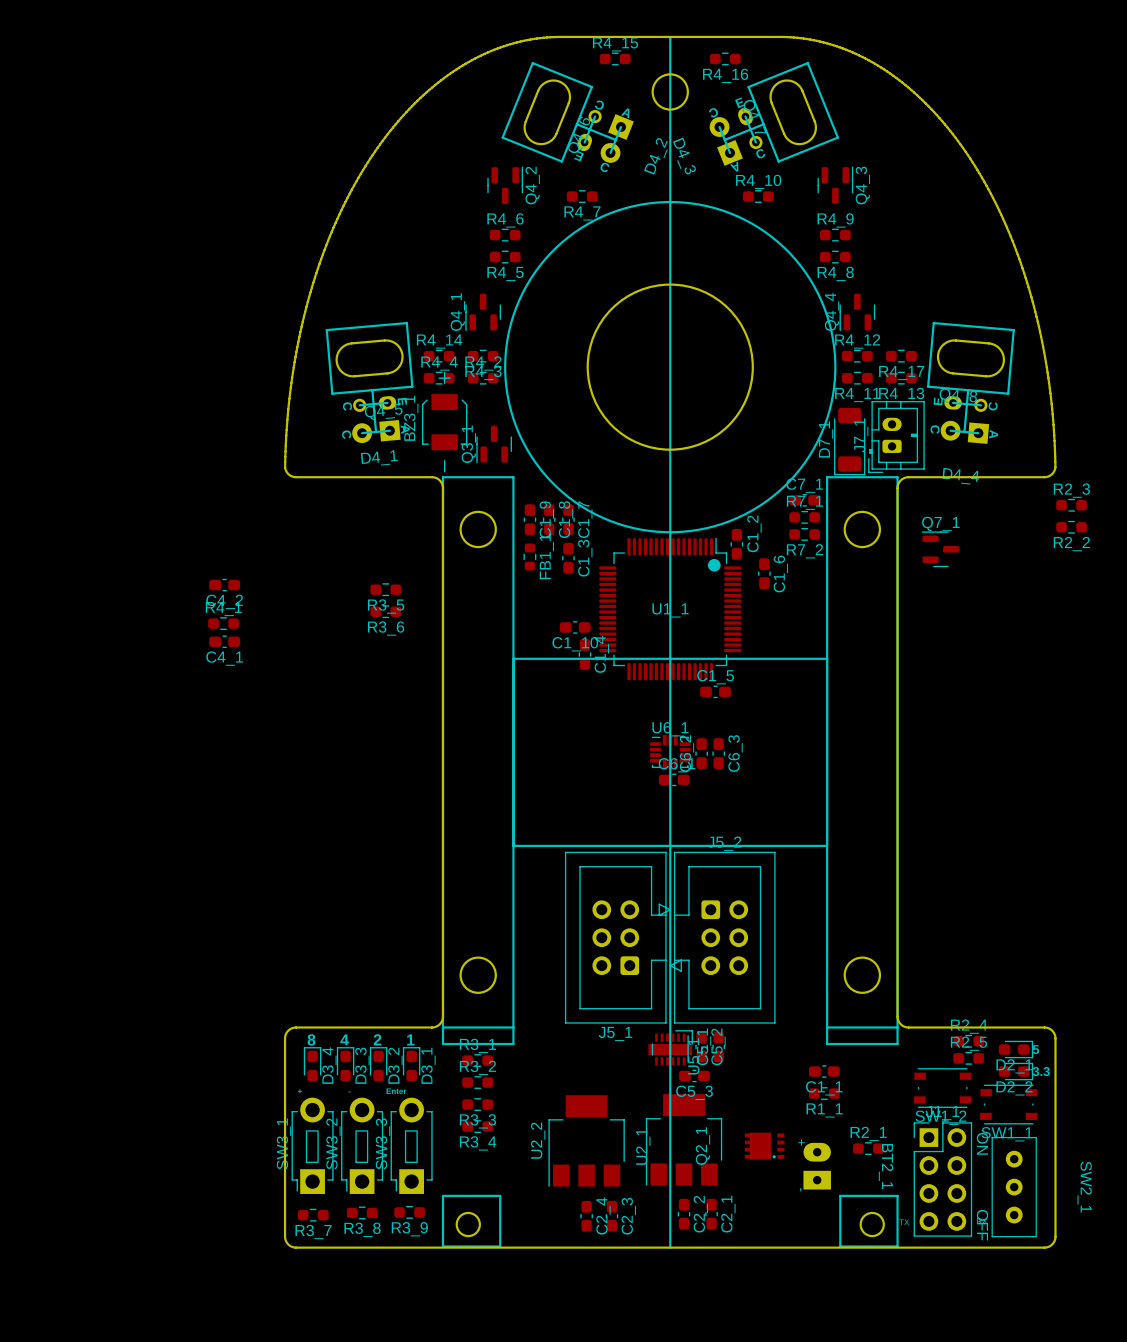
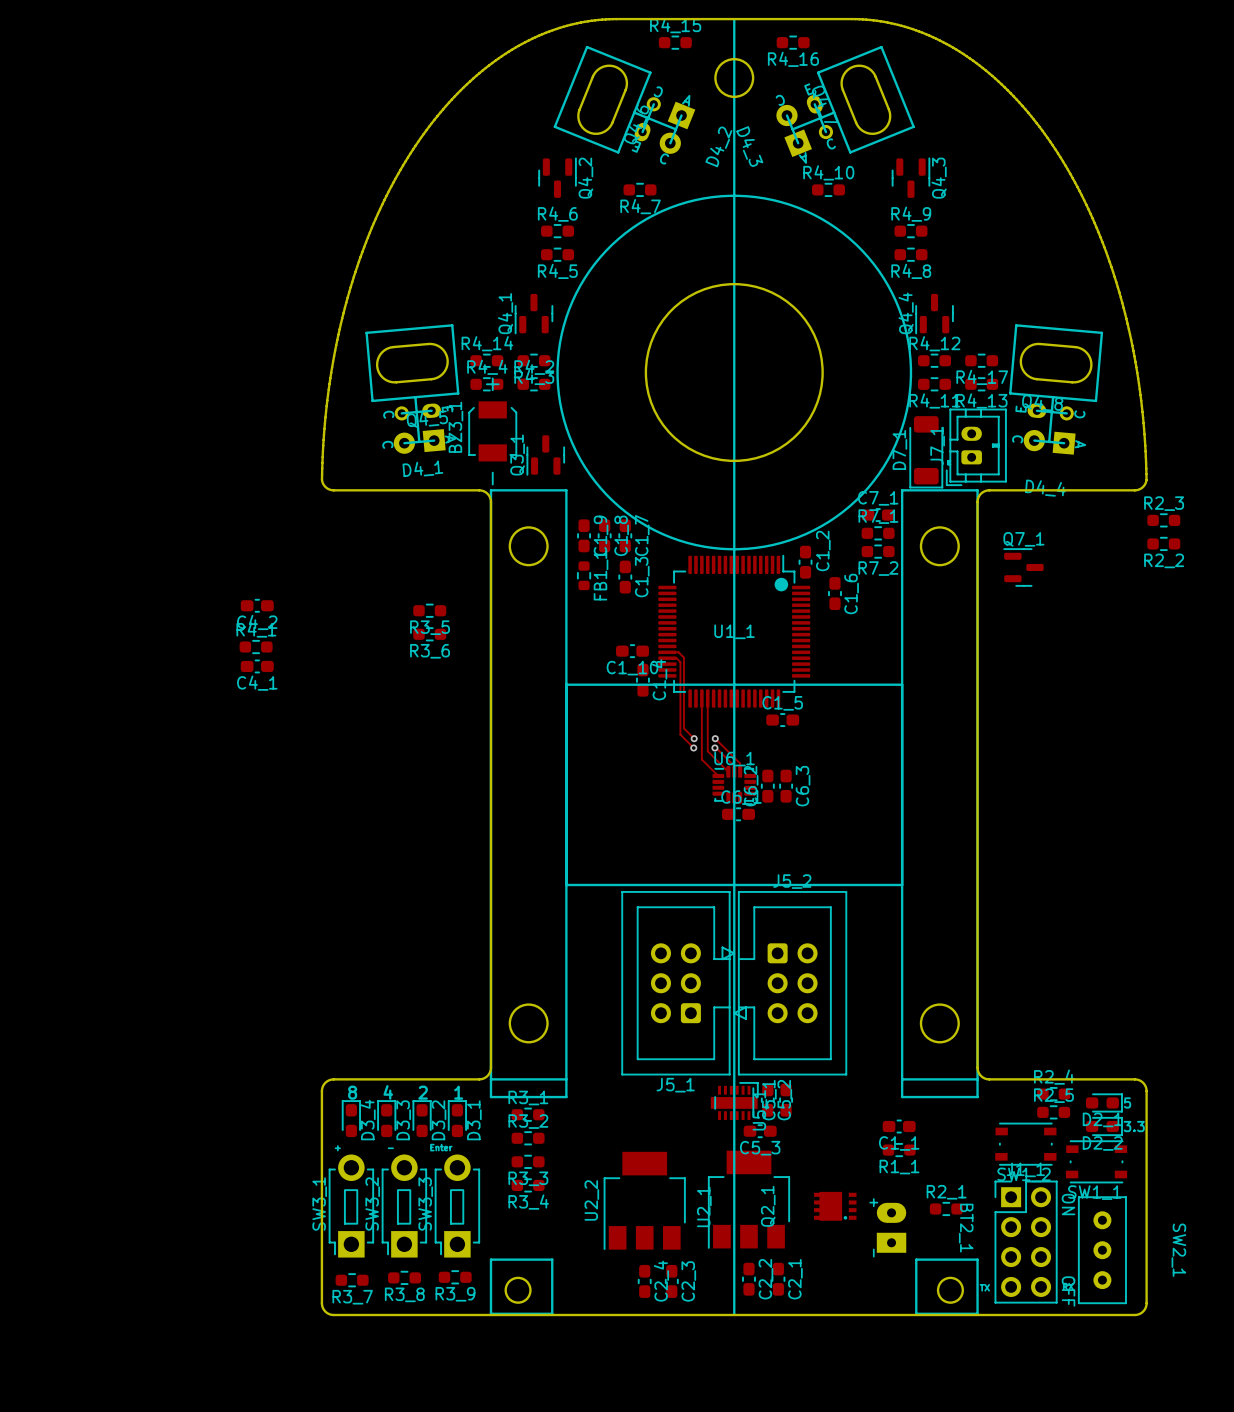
track: none -> (667, 652) (678, 652) (683, 657) (683, 728) (694, 738)
track: none -> (667, 658) (676, 658) (680, 662) (680, 734) (693, 747)
track: none -> (701, 698) (701, 759) (718, 776)
track: none -> (707, 698) (707, 751) (728, 771)
via: none -> (694, 738)
track: none -> (715, 738) (740, 763) (740, 771)
via: none -> (715, 738)
via: none -> (693, 747)
track: none -> (714, 747) (734, 766) (734, 771)
via: none -> (714, 747)

